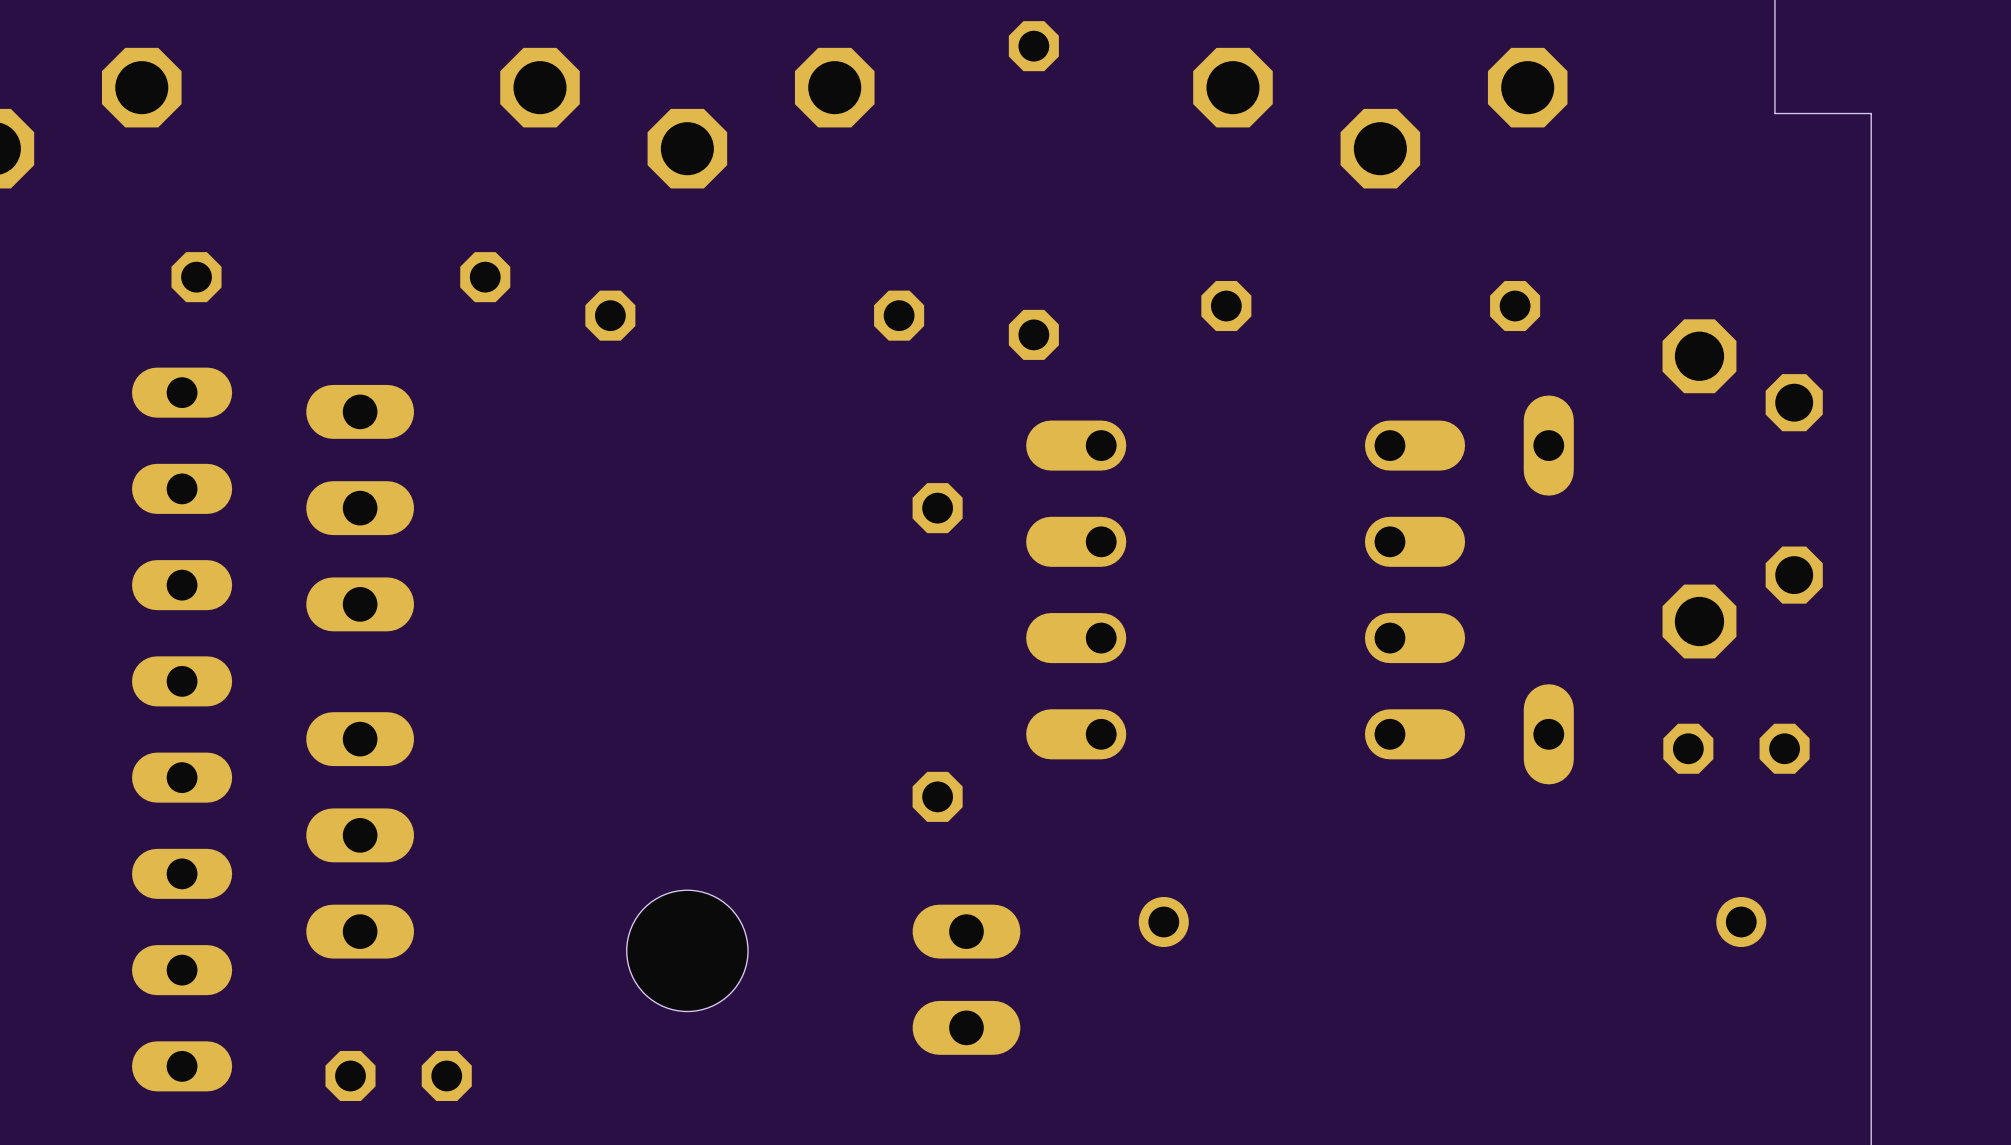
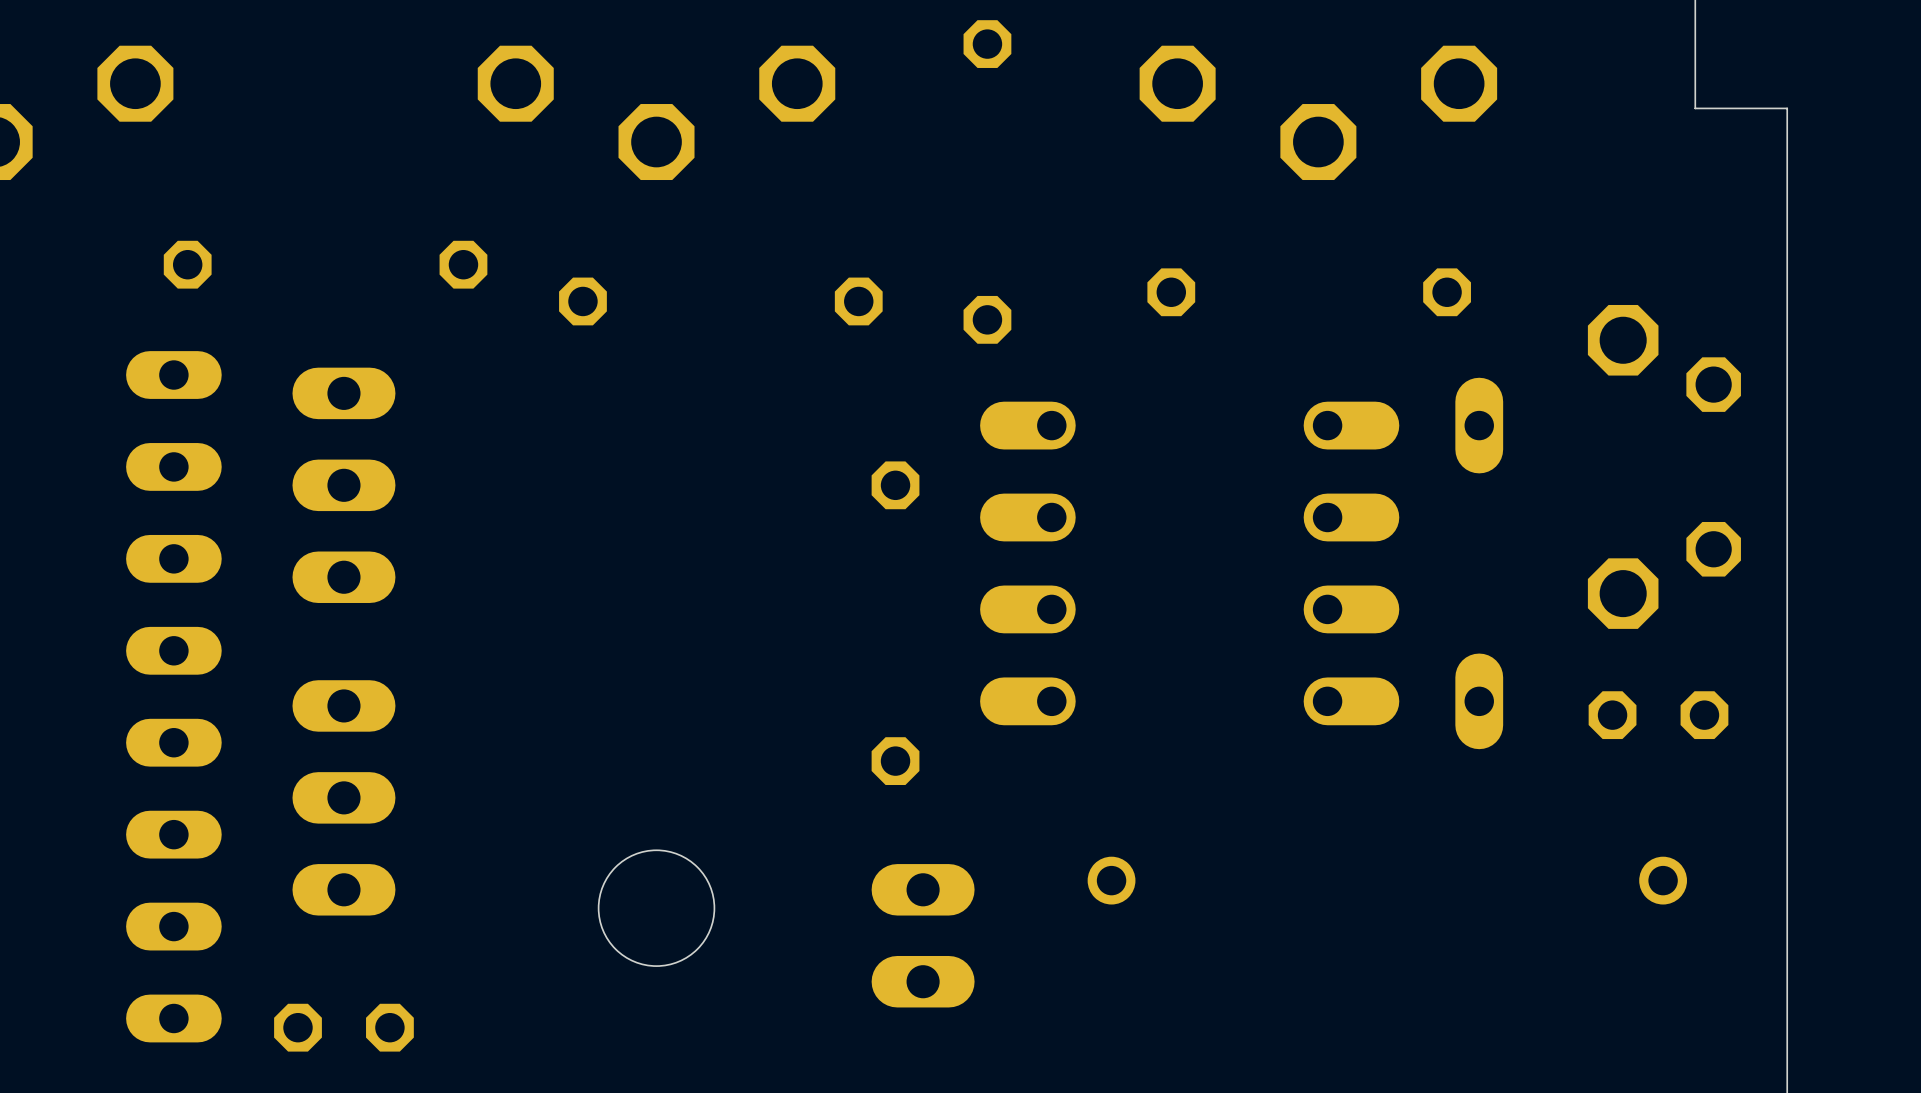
part position: (398, 1075) -> (343, 1027)

